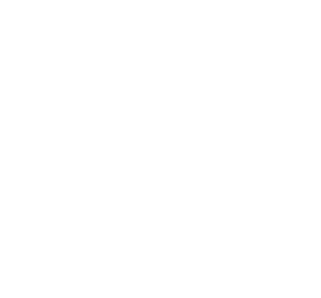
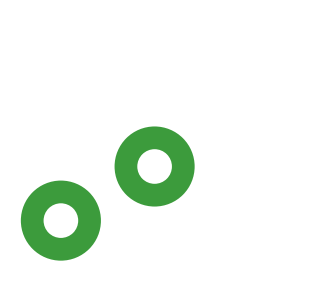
part: none -> (107, 193)

